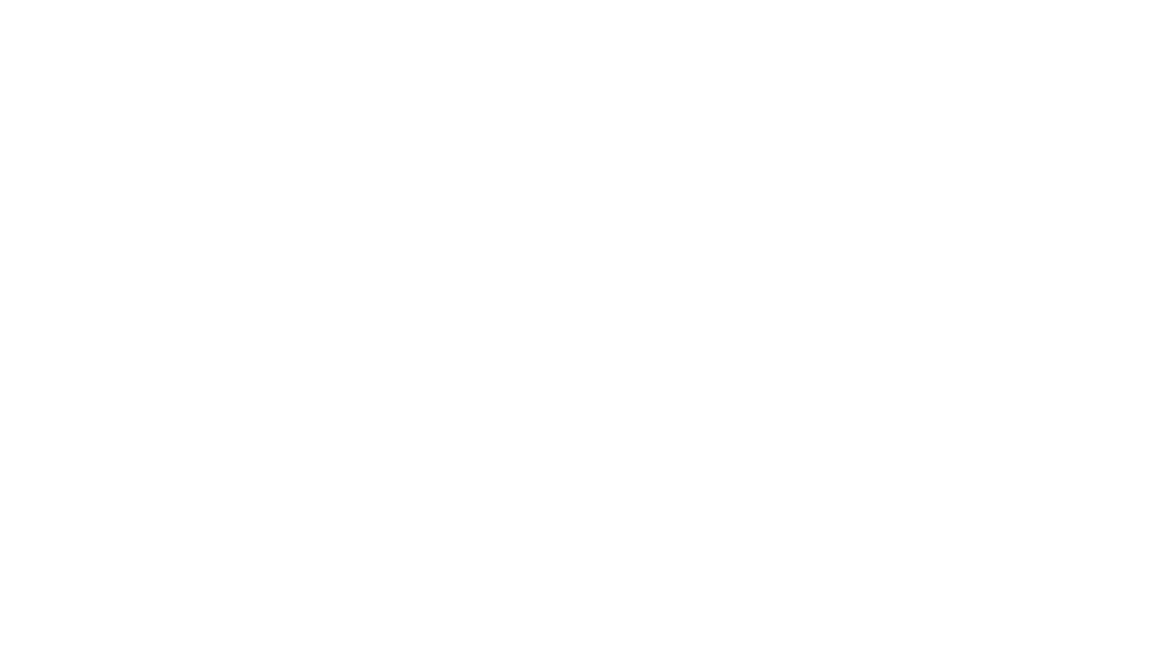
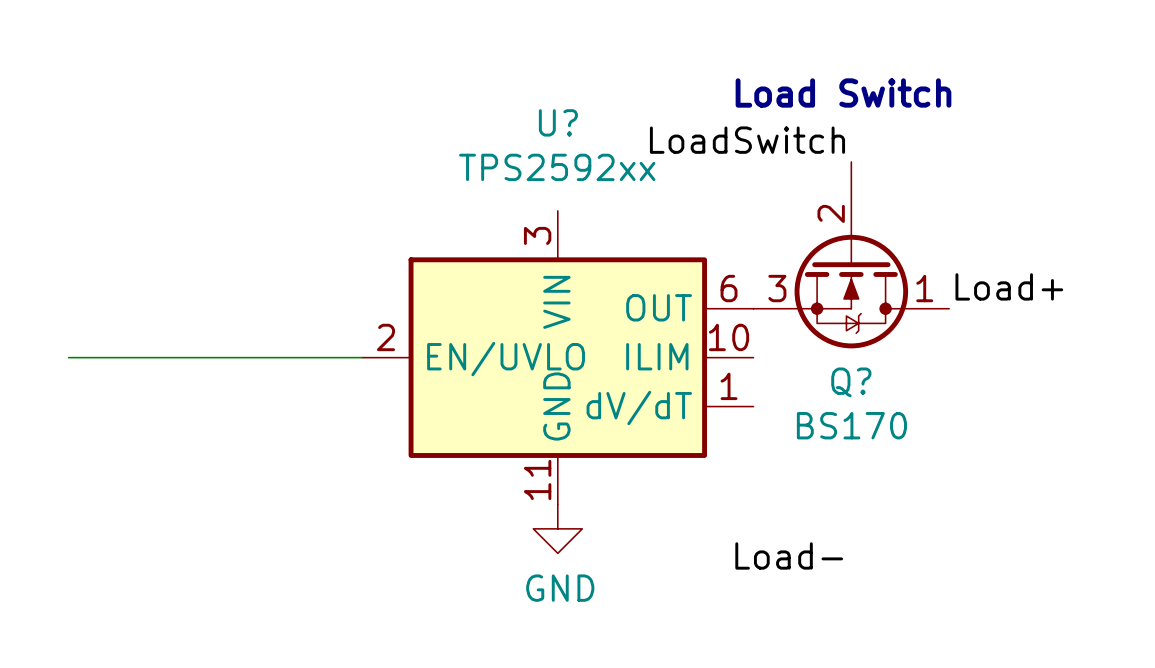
text: none -> Load Switch (843, 92)
label: none -> LoadSwitch (747, 140)
Q?: none -> BS170 (851, 255)
label: none -> Load+ (1009, 286)
wire: none -> (68, 357) (362, 357)
U?: none -> TPS2592xx (557, 357)
power symbol: none -> GND (557, 528)
label: none -> Load- (789, 555)

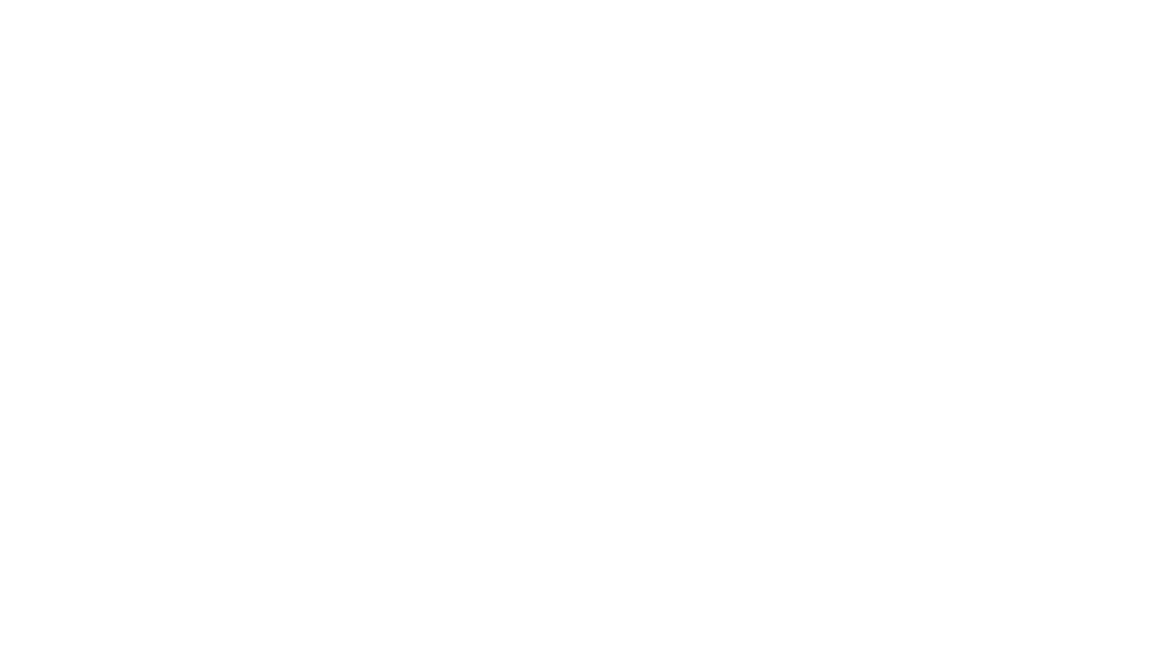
text: Load Switch (843, 92) -> none
label: LoadSwitch (747, 140) -> none
Q?: BS170 (851, 255) -> none
label: Load+ (1009, 286) -> none
wire: (68, 357) (362, 357) -> none
U?: TPS2592xx (557, 357) -> none
power symbol: GND (557, 528) -> none
label: Load- (789, 555) -> none

